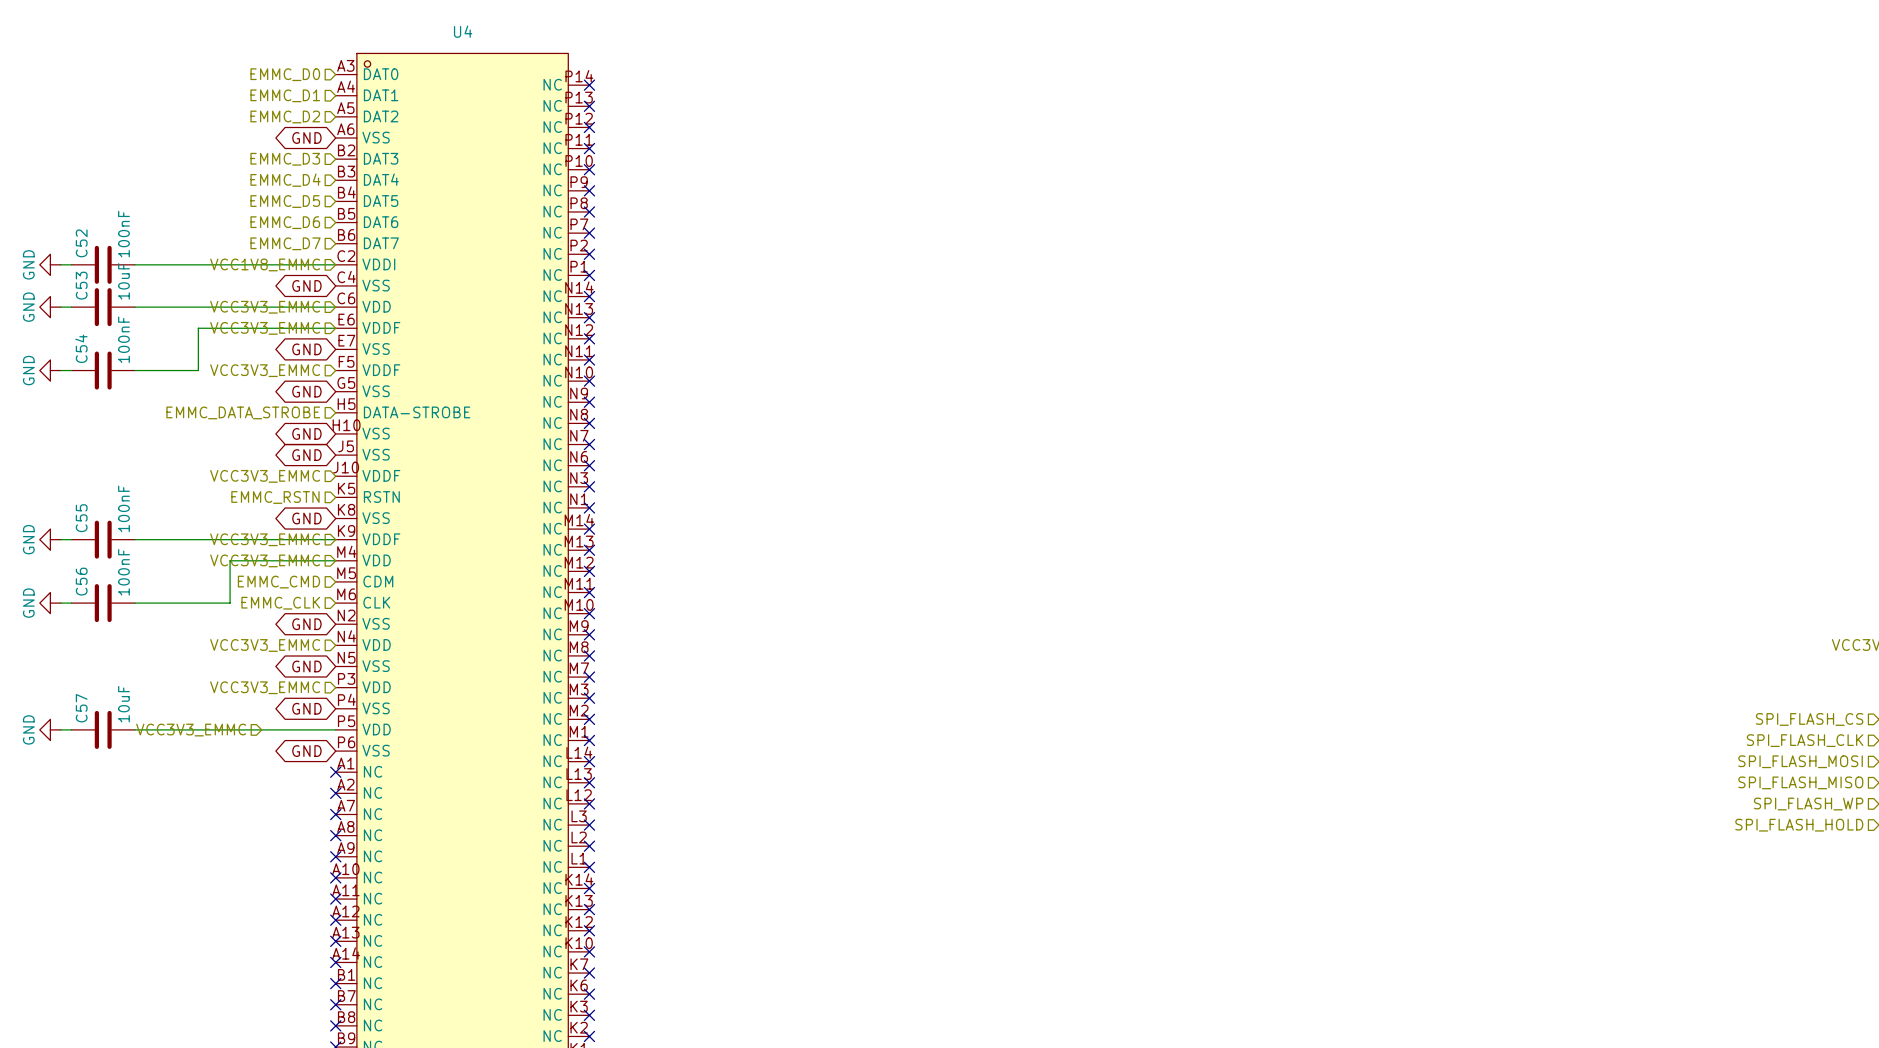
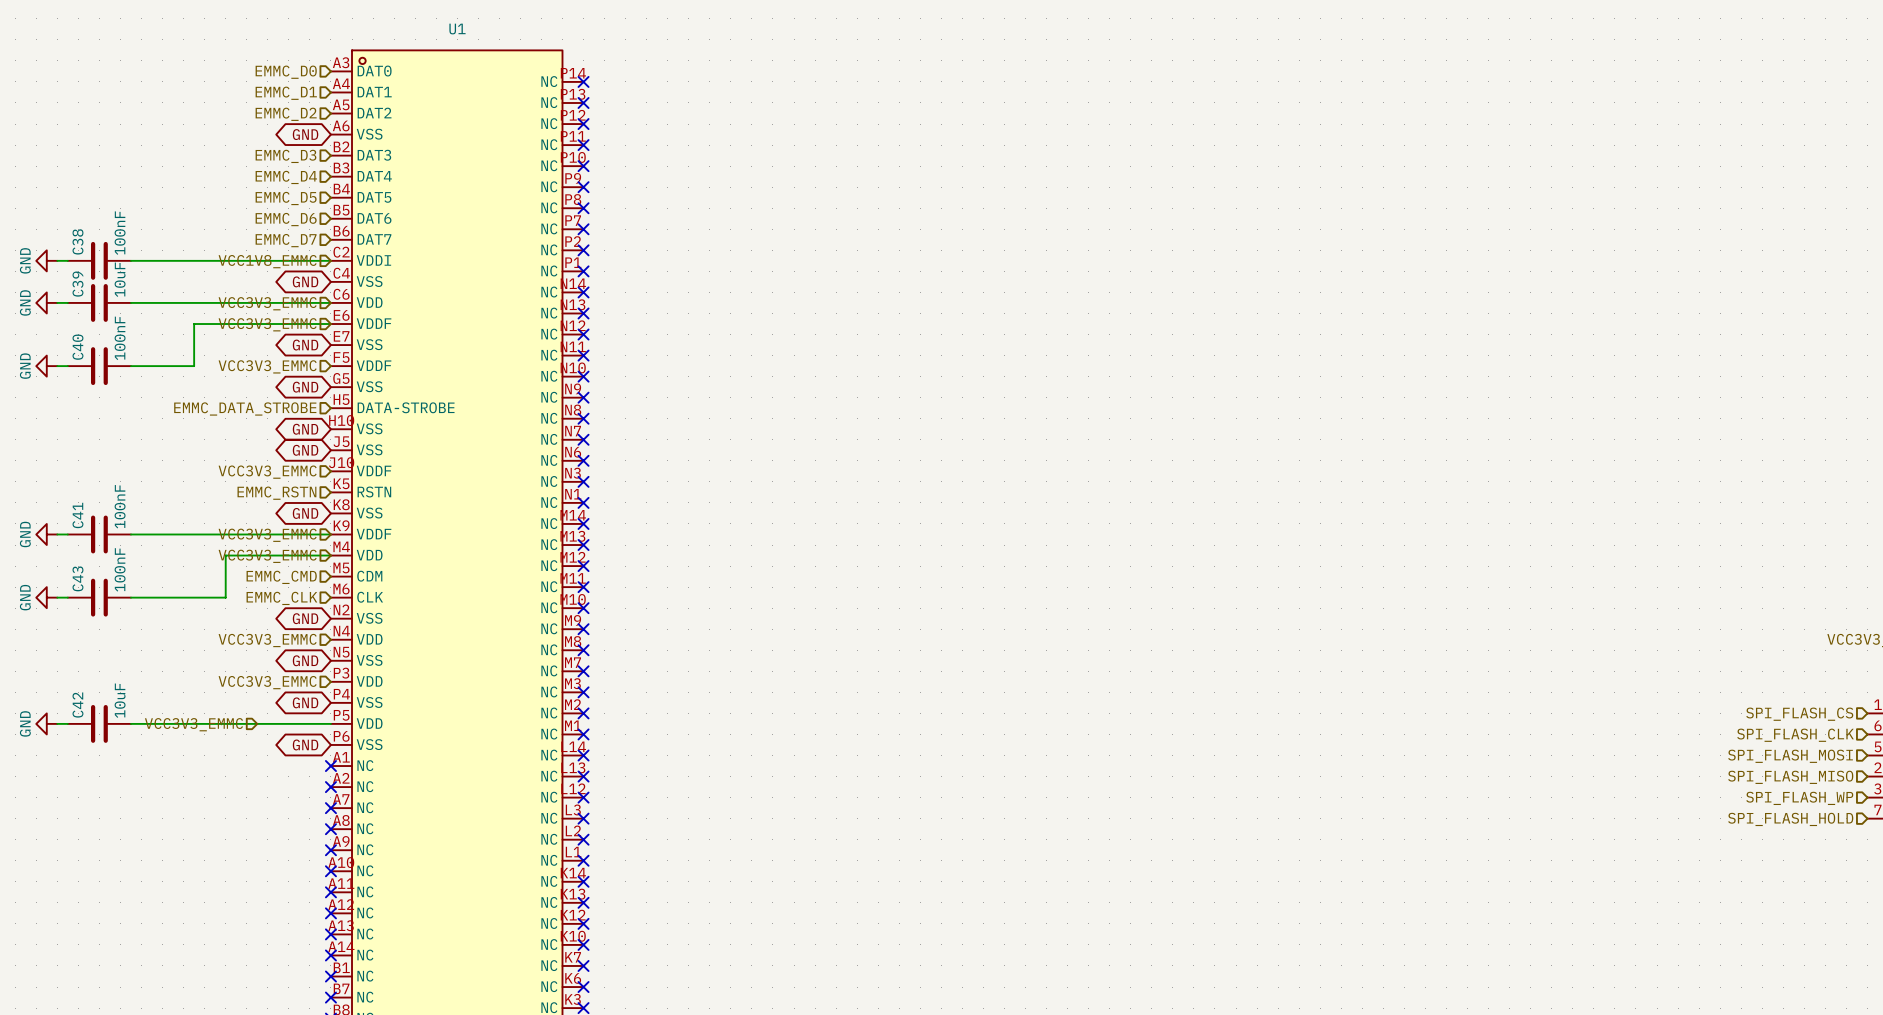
U4 name: U4 (463, 31) -> U1 (457, 29)
C52 name: C52 (81, 243) -> C38 (77, 241)
C53 name: C53 (81, 285) -> C39 (77, 284)
C54 name: C54 (81, 348) -> C40 (77, 347)
C55 name: C55 (81, 518) -> C41 (77, 515)
C56 name: C56 (81, 581) -> C43 (77, 578)
C57 name: C57 (81, 708) -> C42 (77, 705)

